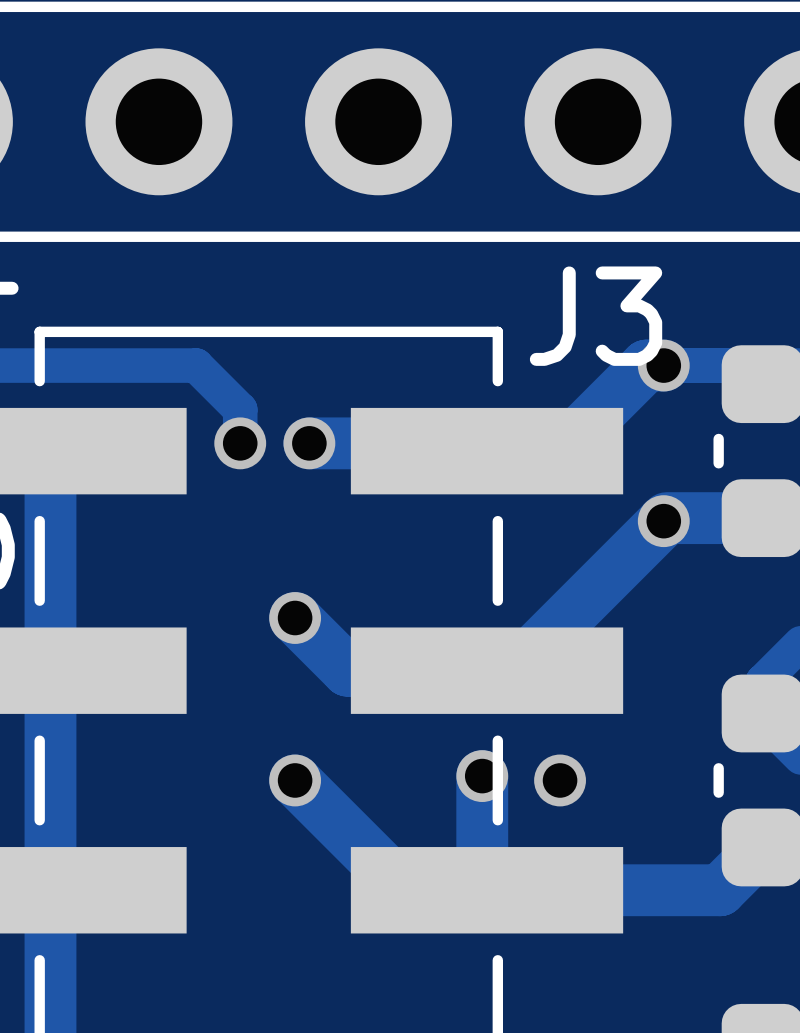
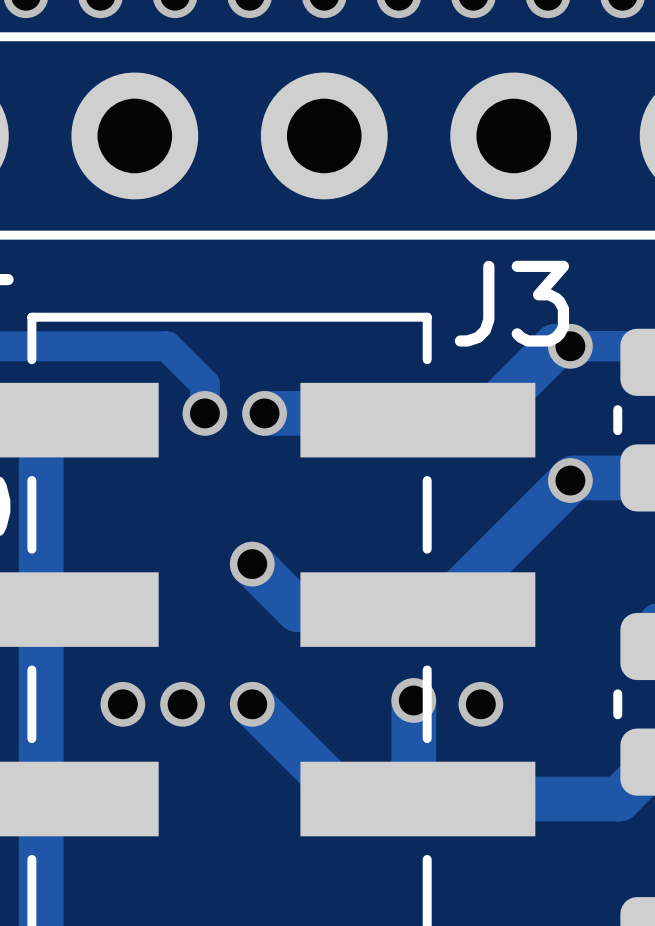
via: none -> (122, 704)
via: none -> (182, 704)

